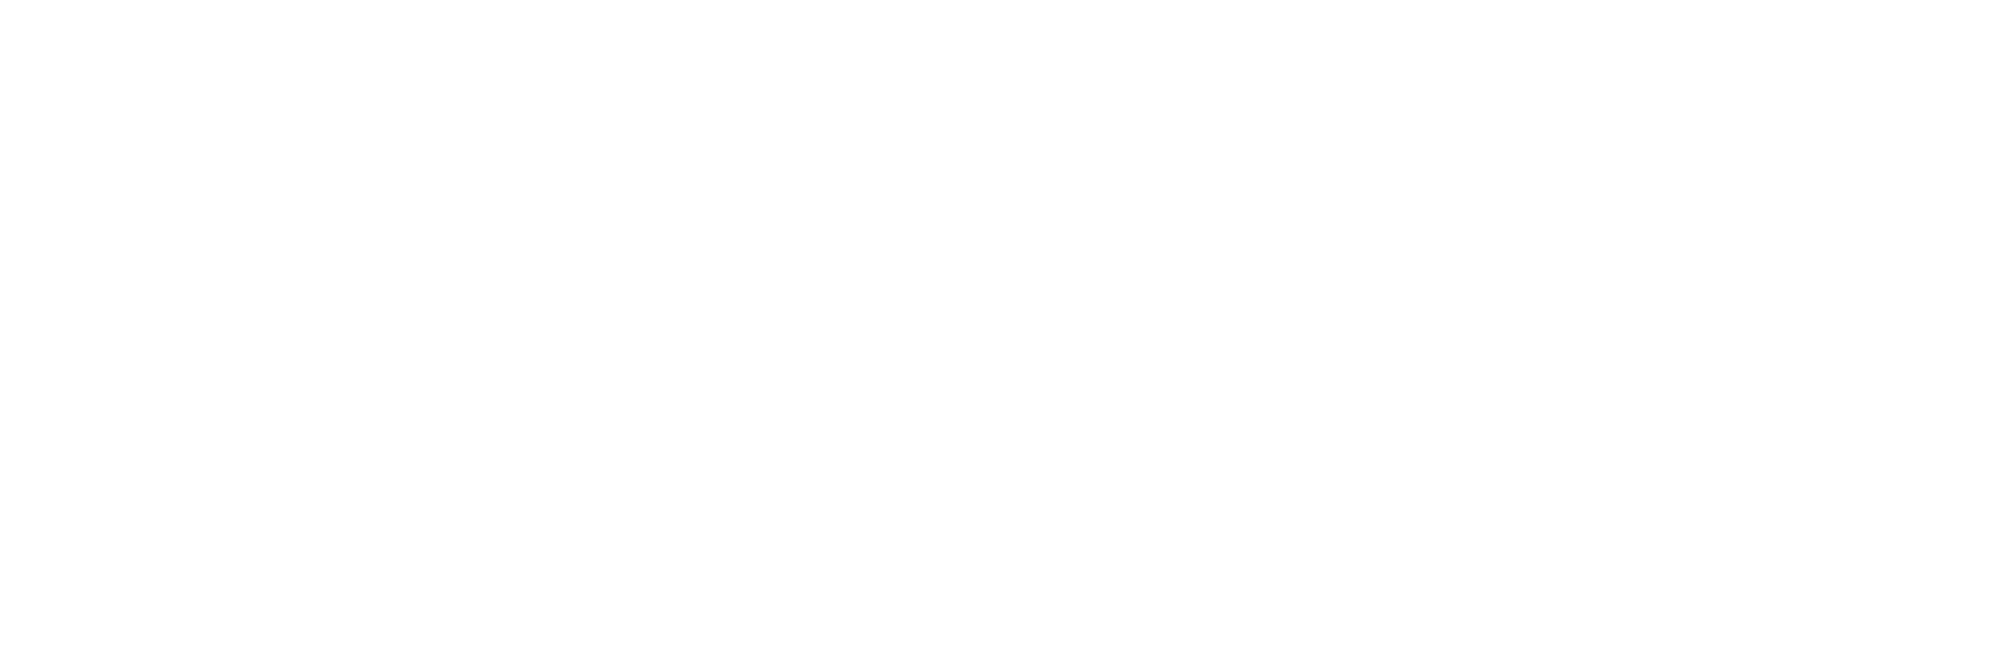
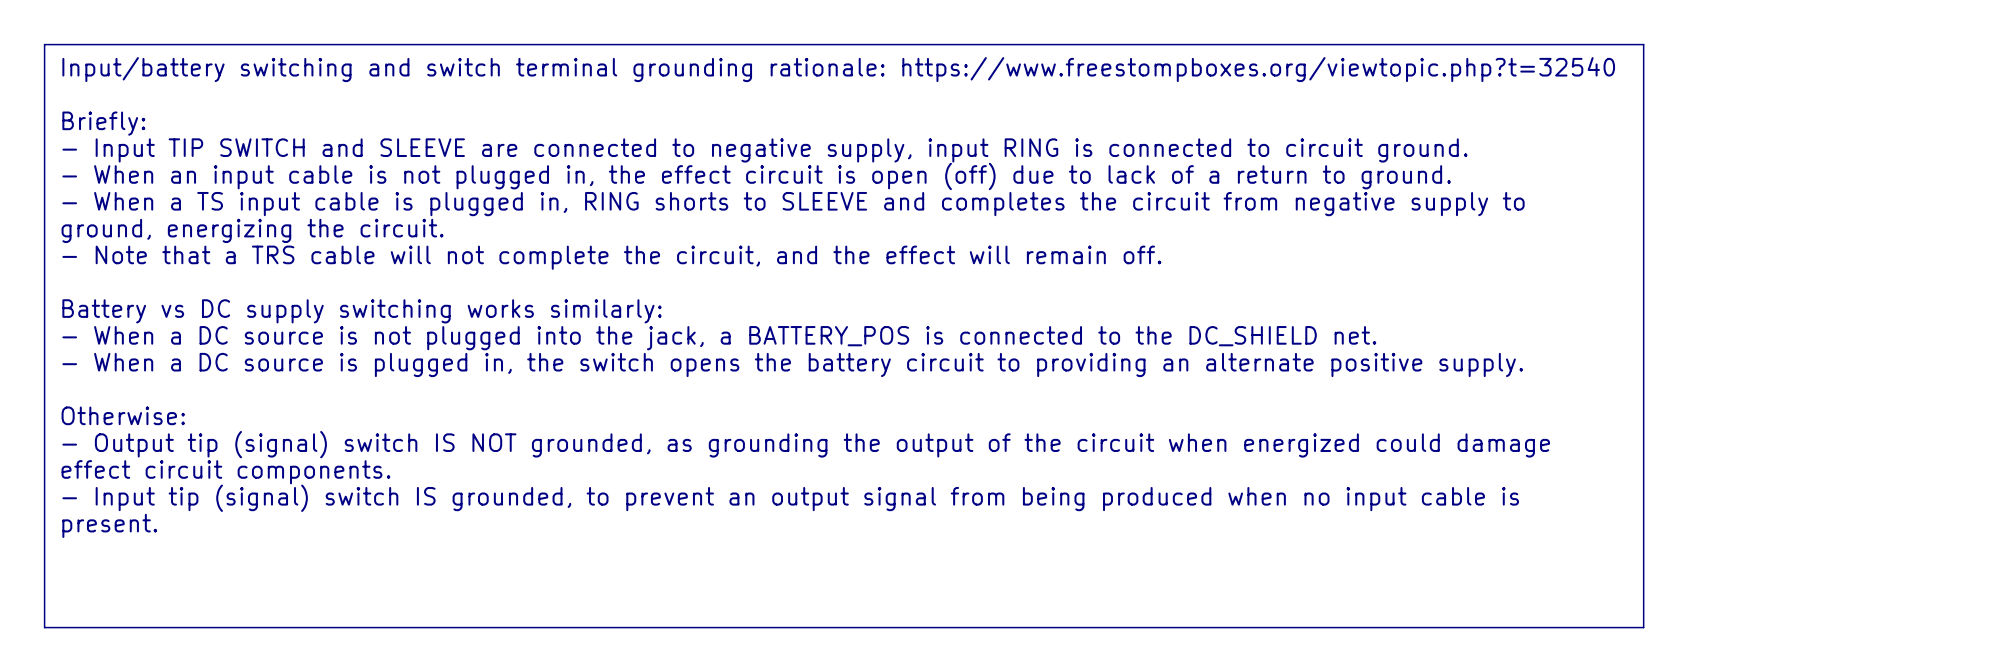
line: none -> (44, 44) (1643, 44) (1643, 627) (44, 627) (44, 44)
text: none -> Input/battery switching and switch terminal grounding rationale: https://www.freestompboxes.org/viewtopic.php?t=32540 (838, 69)
text: none -> Briefly: (103, 123)
text: none -> - Input TIP SWITCH and SLEEVE are connected to negative supply, input RING is connected to circuit ground. (764, 150)
text: none -> - When an input cable is not plugged in, the effect circuit is open (off) due to lack of a return to ground. (756, 176)
text: none -> - When a TS input cable is plugged in, RING shorts to SLEEVE and completes the circuit from negative supply to (793, 204)
text: none -> ground, energizing the circuit. (252, 230)
text: none -> - Note that a TRS cable will not complete the circuit, and the effect will remain off. (611, 257)
text: none -> Battery vs DC supply switching works similarly: (362, 311)
text: none -> - When a DC source is not plugged into the jack, a BATTERY_POS is connected to the DC_SHIELD net. (719, 338)
text: none -> - When a DC source is plugged in, the switch opens the battery circuit to providing an alternate positive supply. (792, 364)
text: none -> Otherwise: (123, 415)
text: none -> - Output tip (signal) switch IS NOT grounded, as grounding the output of the circuit when energized could damage (806, 444)
text: none -> effect circuit components. (225, 472)
text: none -> - Input tip (signal) switch IS grounded, to prevent an output signal from being produced when no input cable is (790, 498)
text: none -> present. (109, 525)

